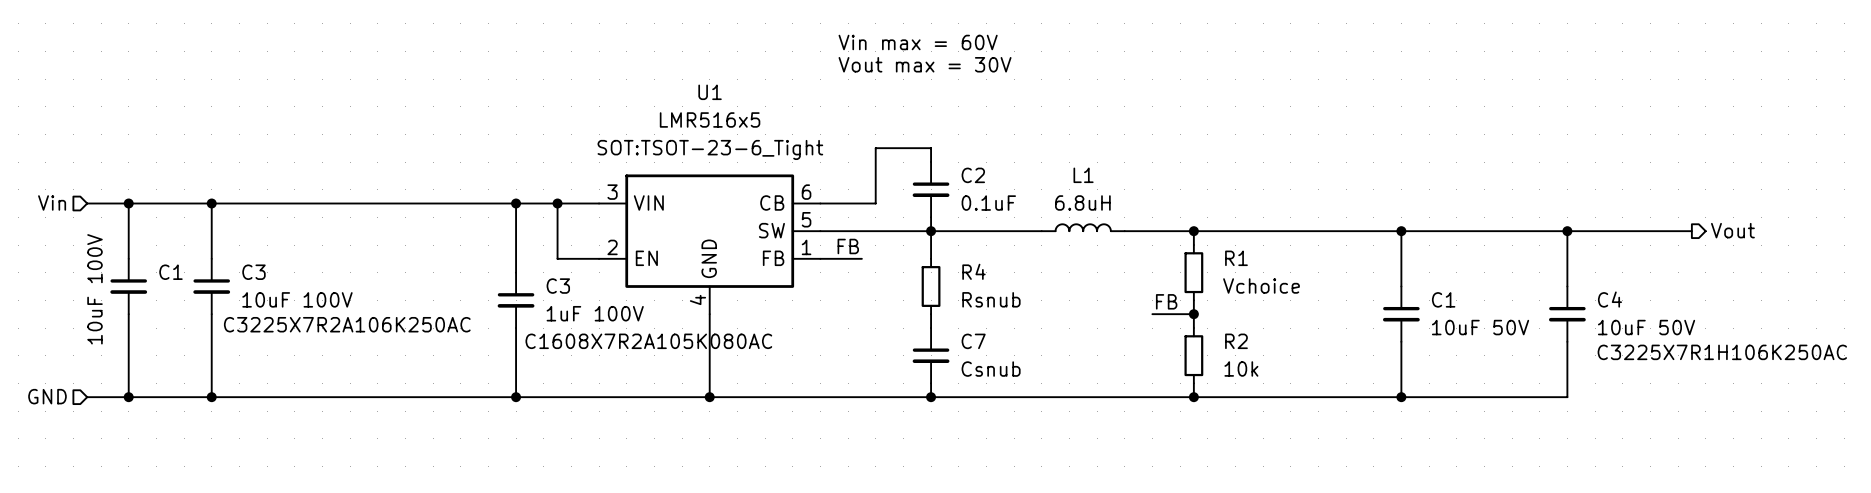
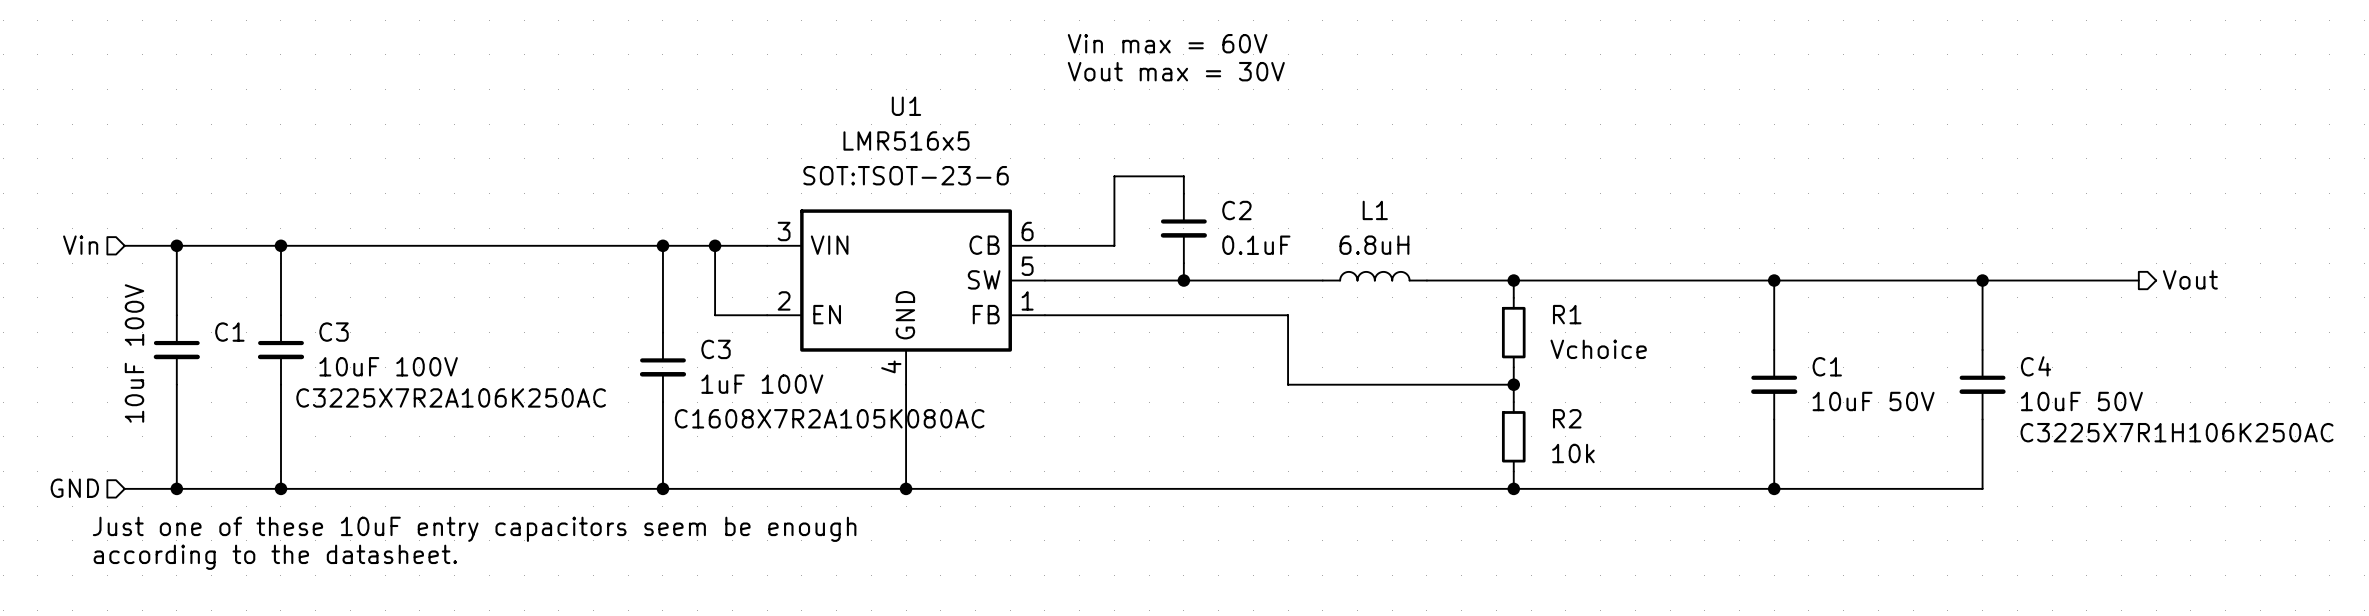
U1 text: SOT:TSOT-23-6_Tight (710, 149) -> SOT:TSOT-23-6 (906, 175)
wire: (931, 231) (931, 258) -> none
label: FB (848, 246) -> none
wire: none -> (1097, 315) (1288, 315) (1288, 384) (1461, 384)
R4: Rsnub (931, 286) -> none
label: FB (1166, 301) -> none
wire: (931, 314) (931, 328) -> none
C7: Csnub (931, 355) -> none
wire: (931, 383) (931, 397) -> none
junction: (931, 397) -> none
text: none -> Just one of these 10uF entry capacitors seem be enough (474, 529)
text: none -> according to the datasheet. (275, 557)

